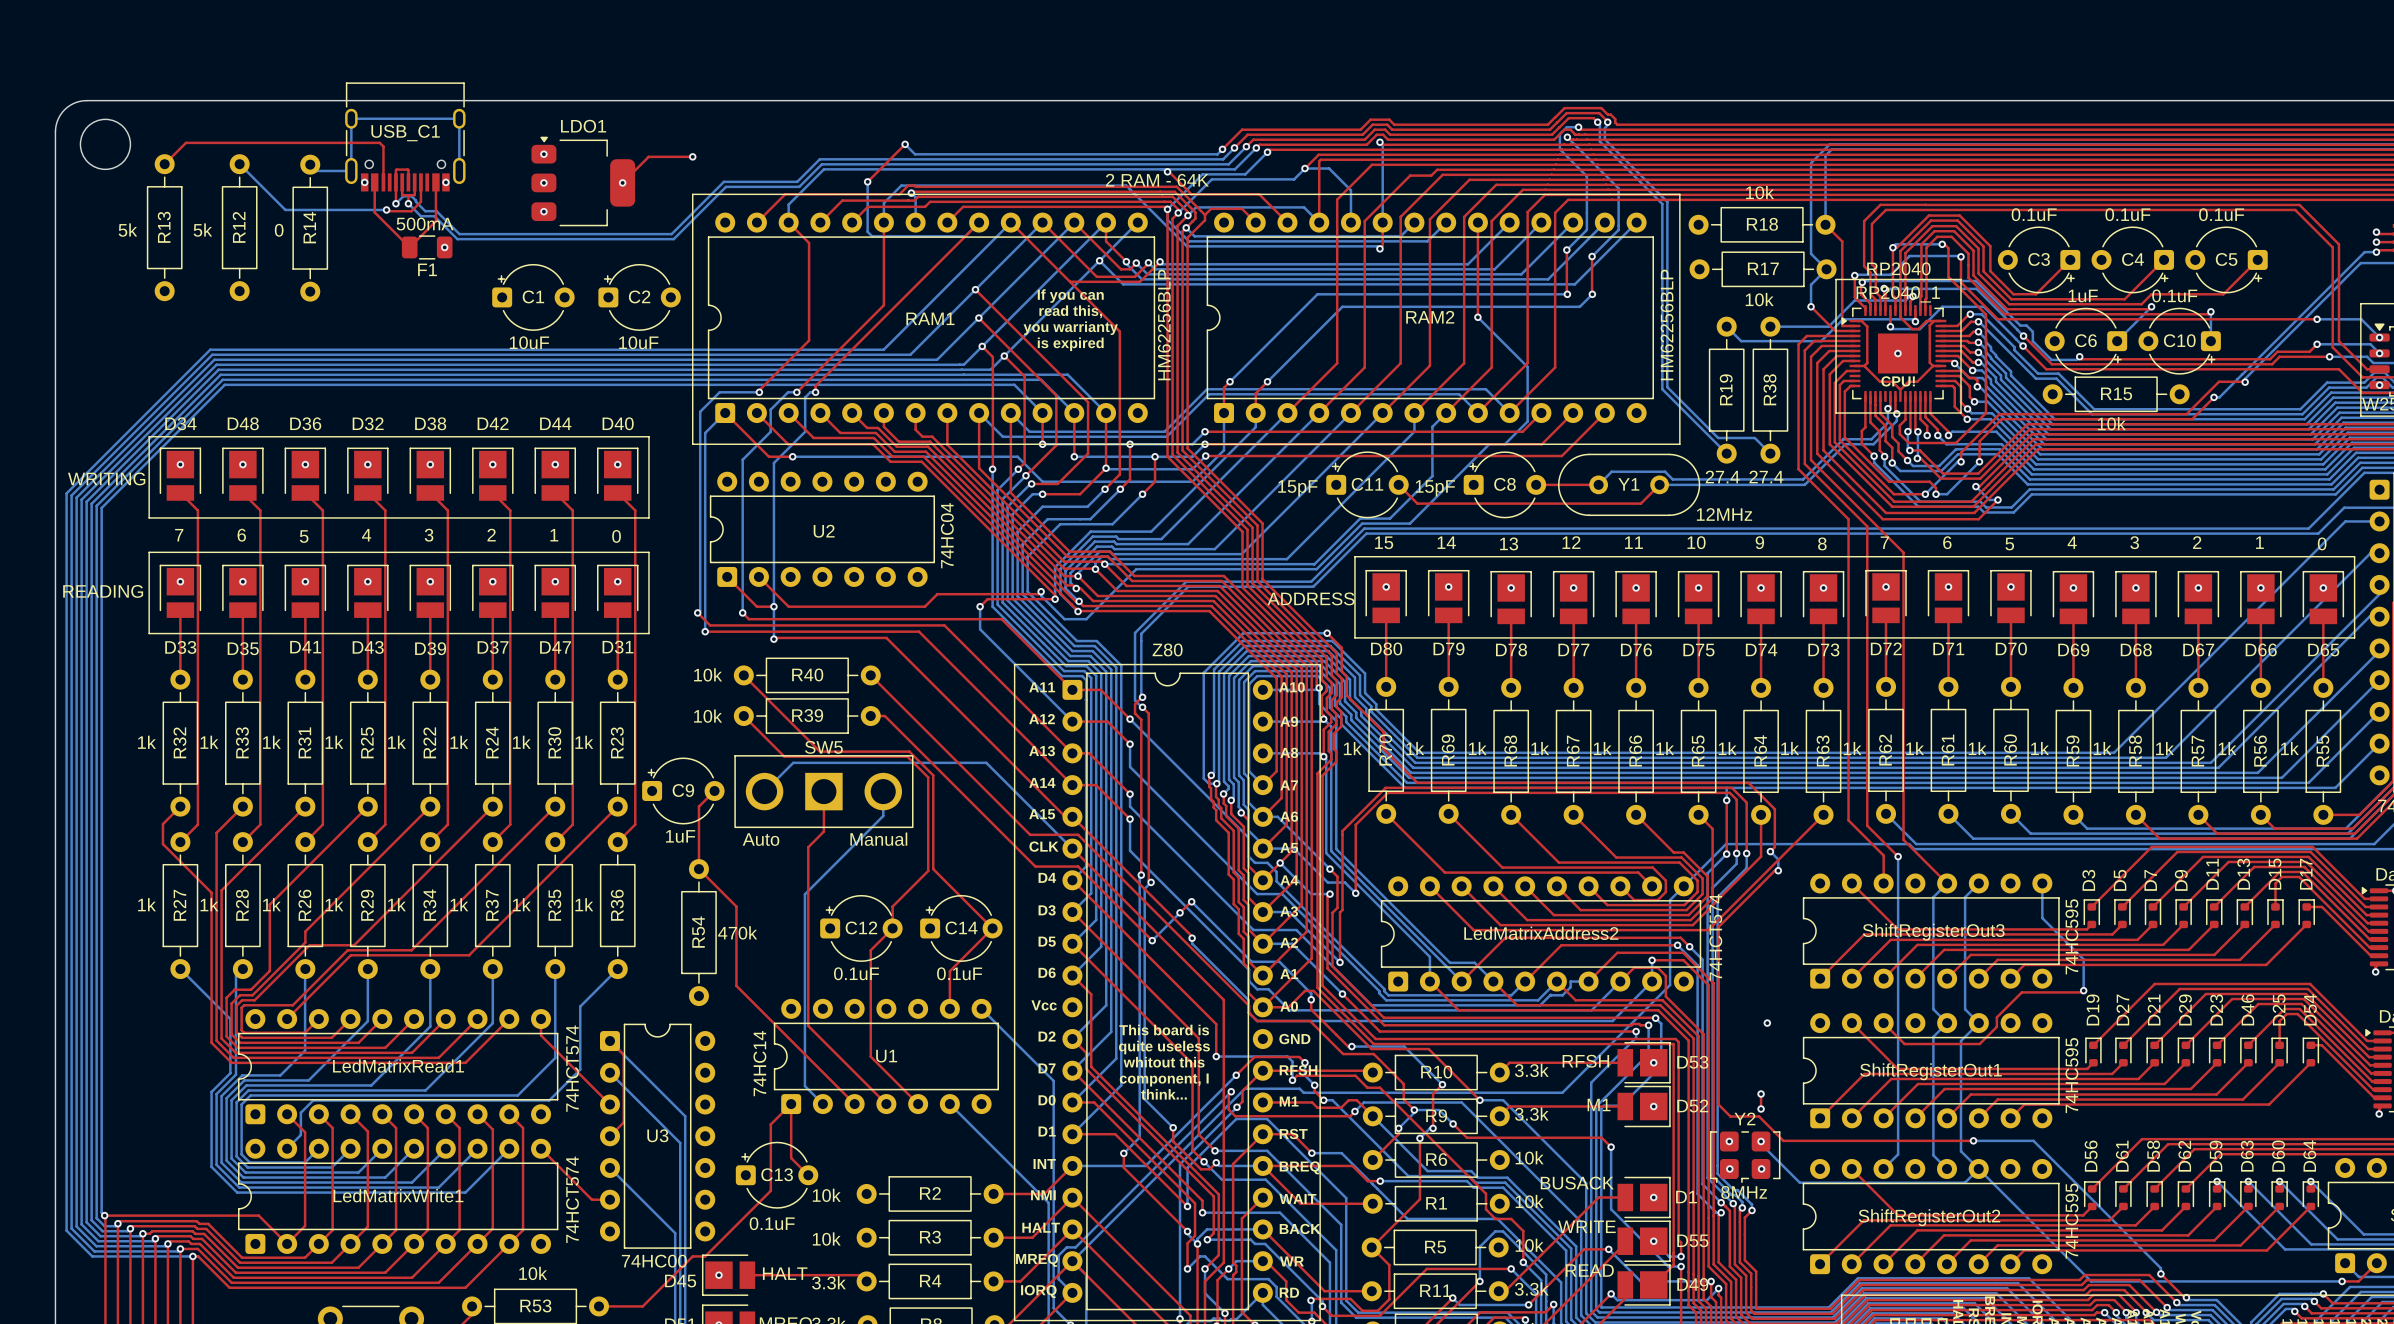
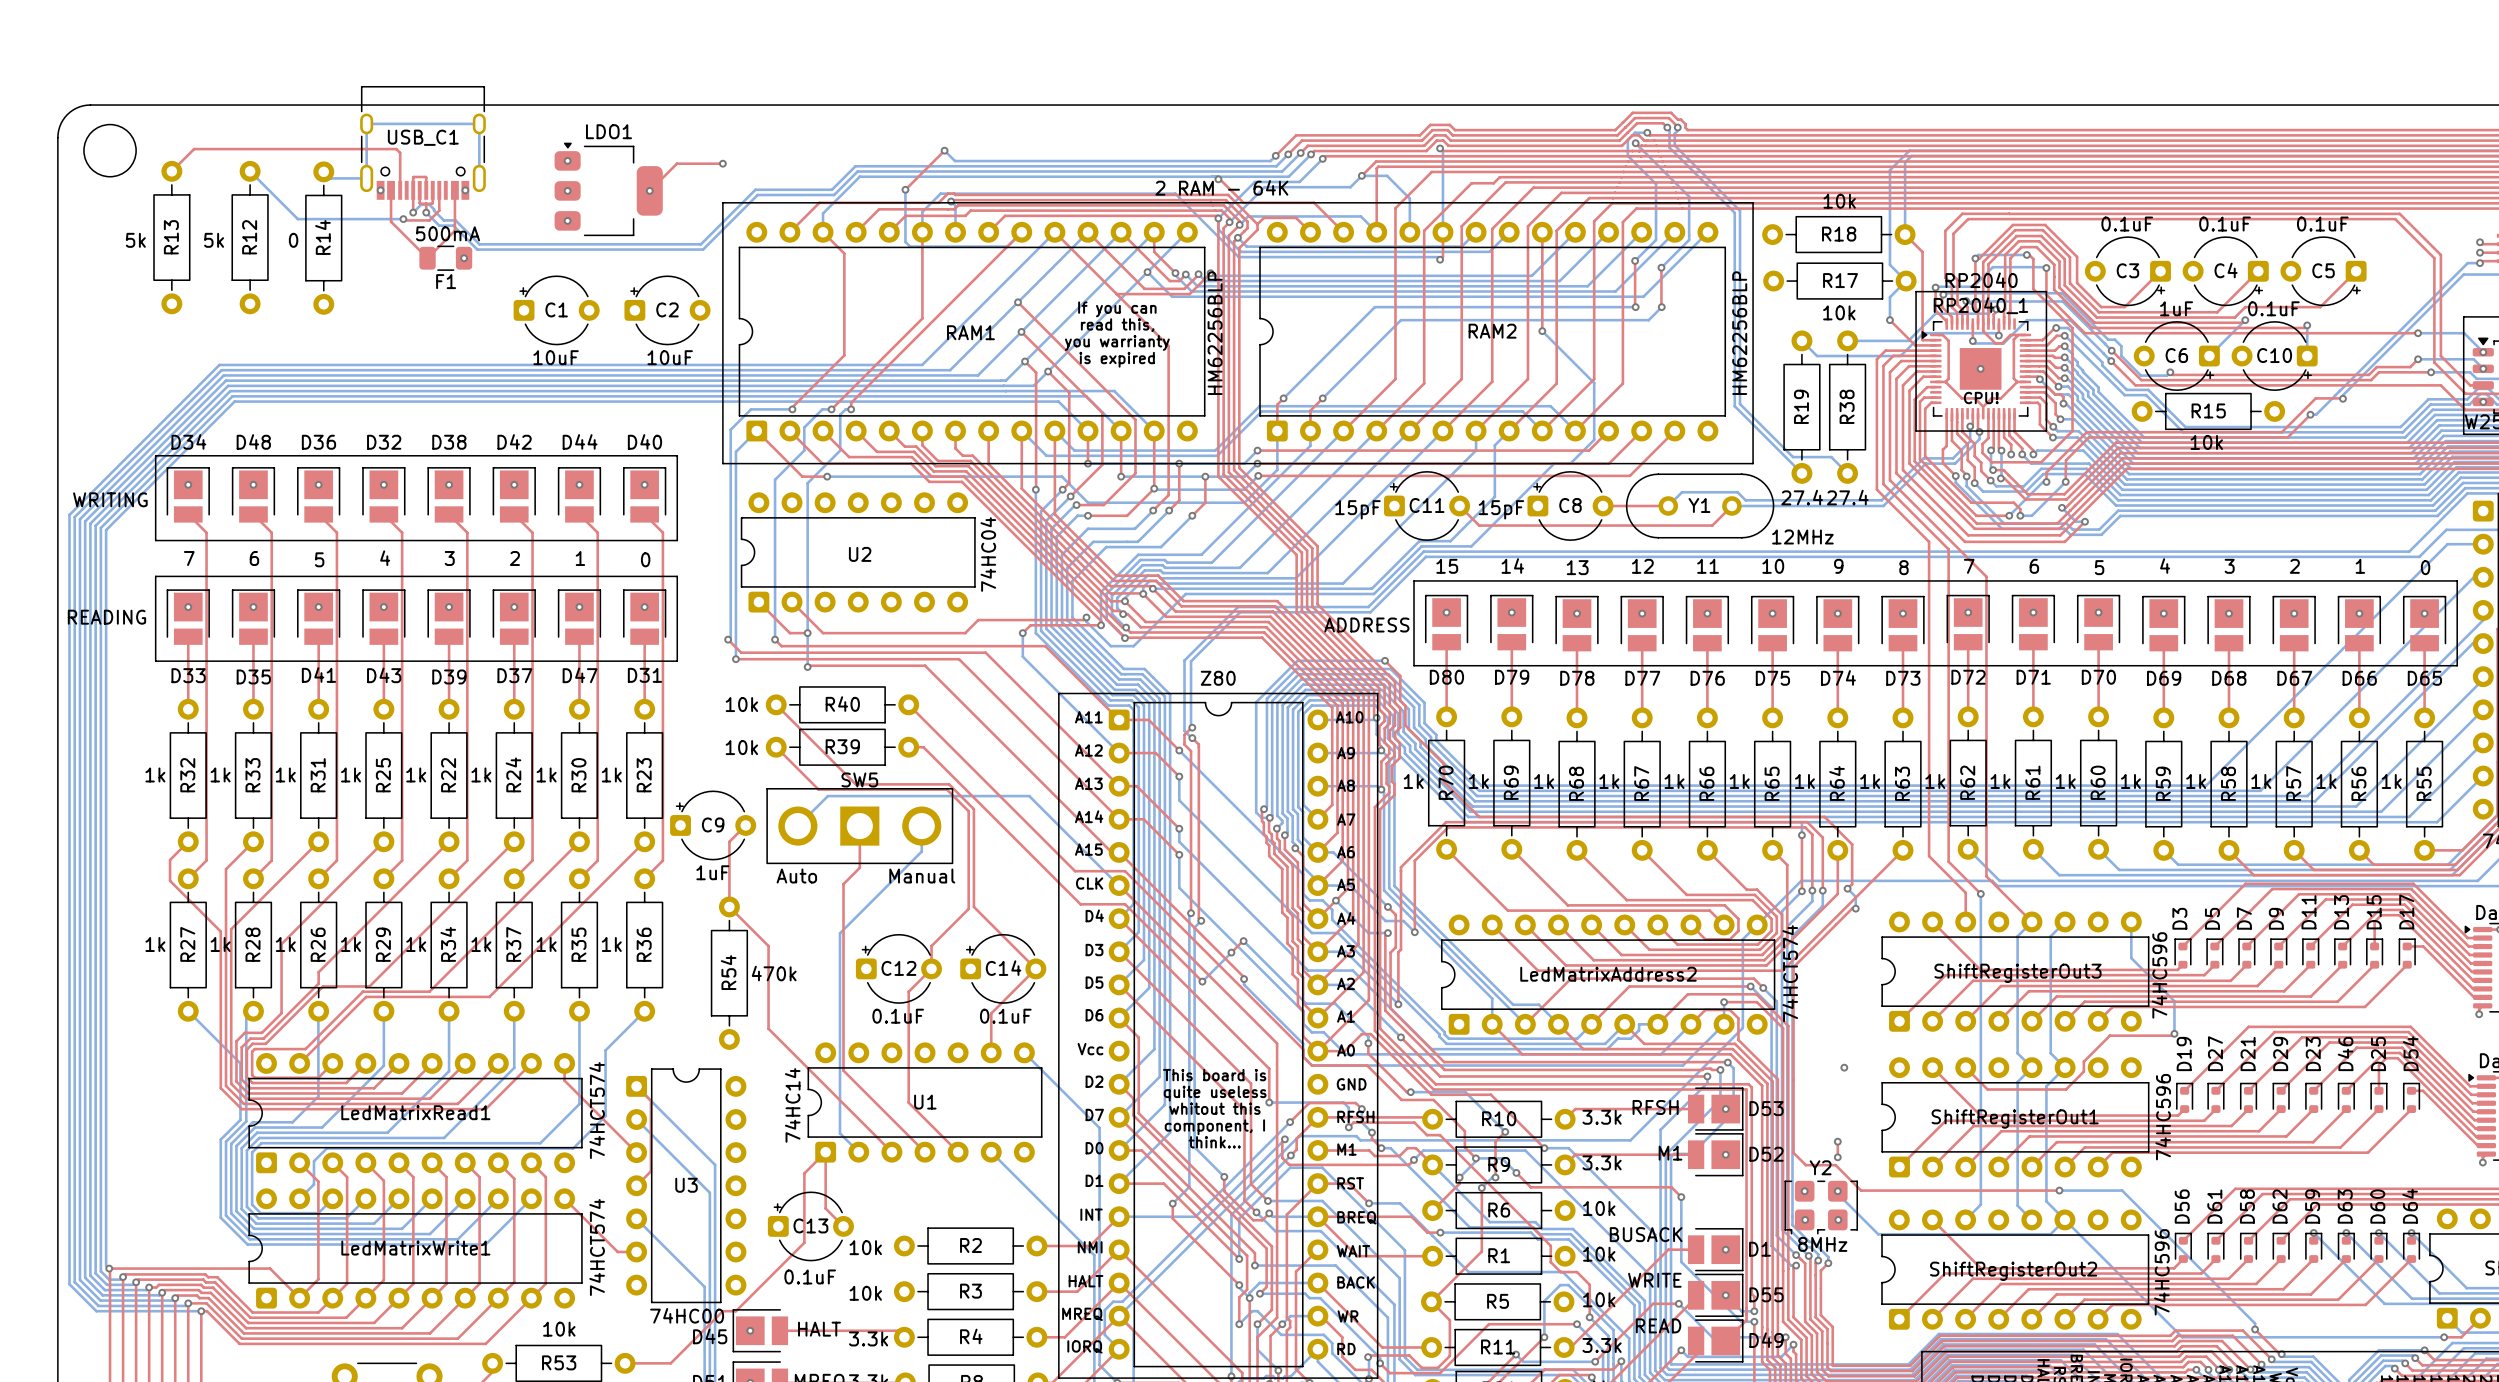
text: 74HC595 (2071, 936) -> 74HC596 (2159, 975)
text: 74HC595 (2071, 1075) -> 74HC596 (2163, 1117)
text: 74HC595 (2071, 1221) -> 74HC596 (2161, 1272)

